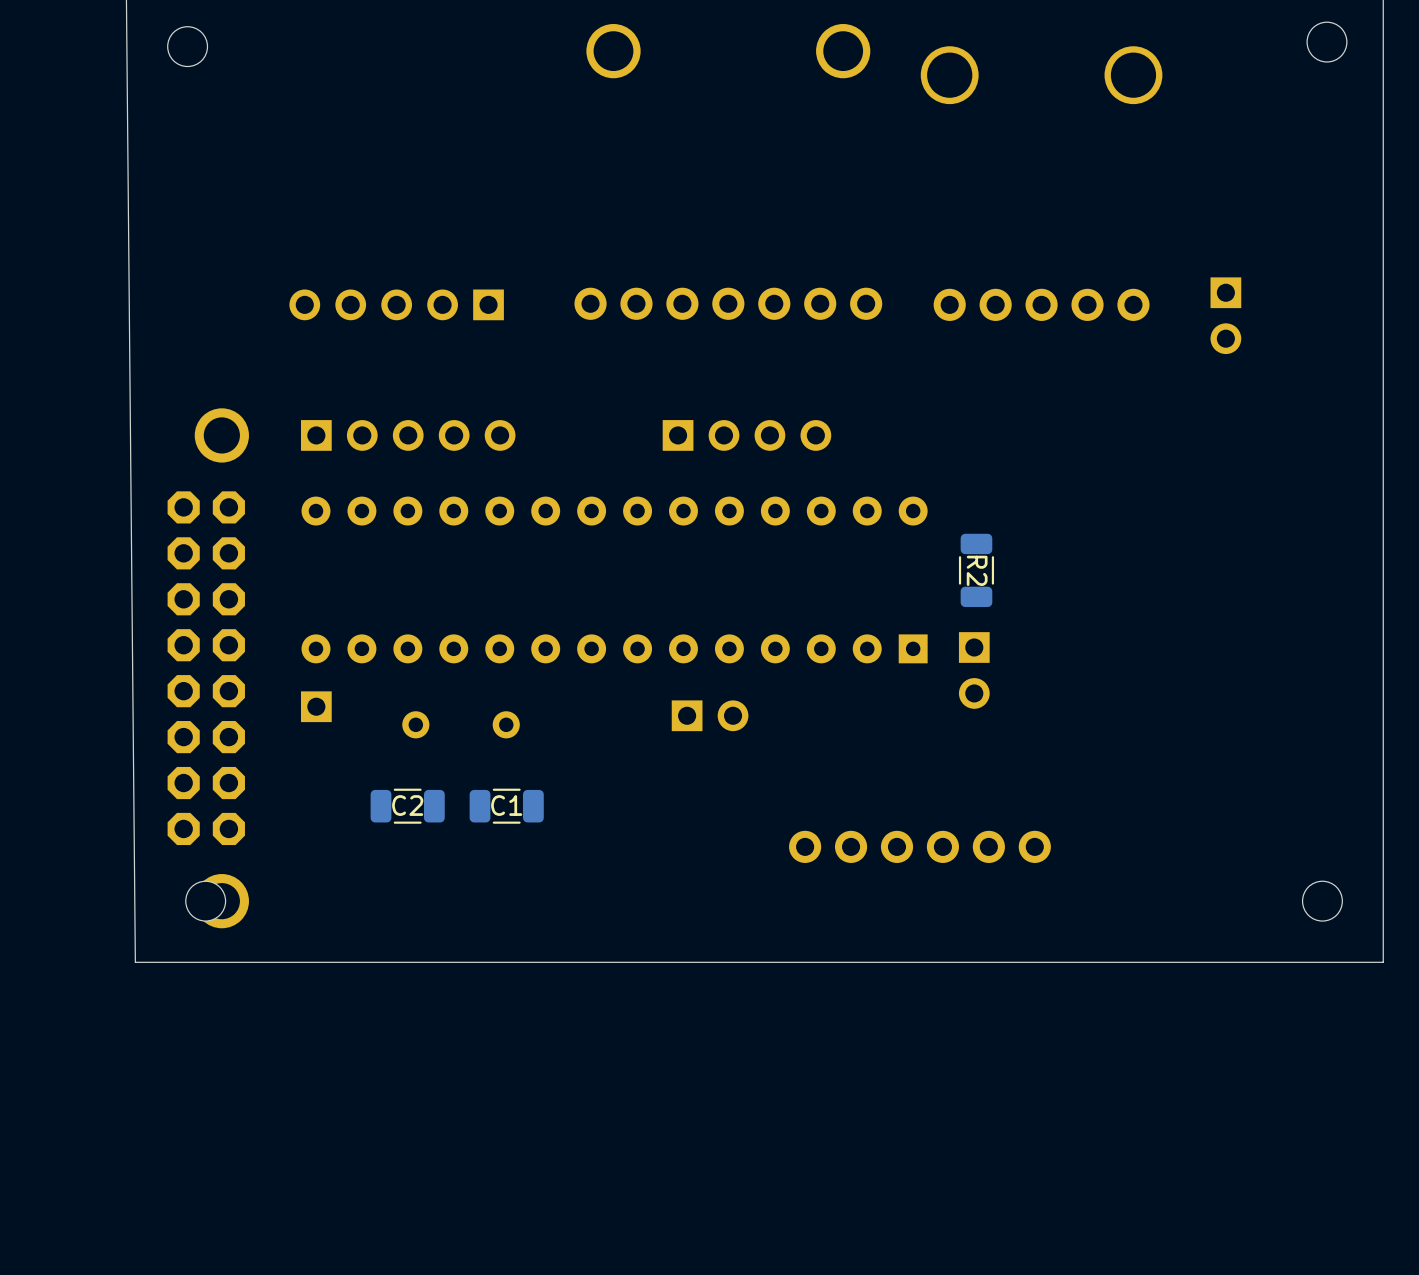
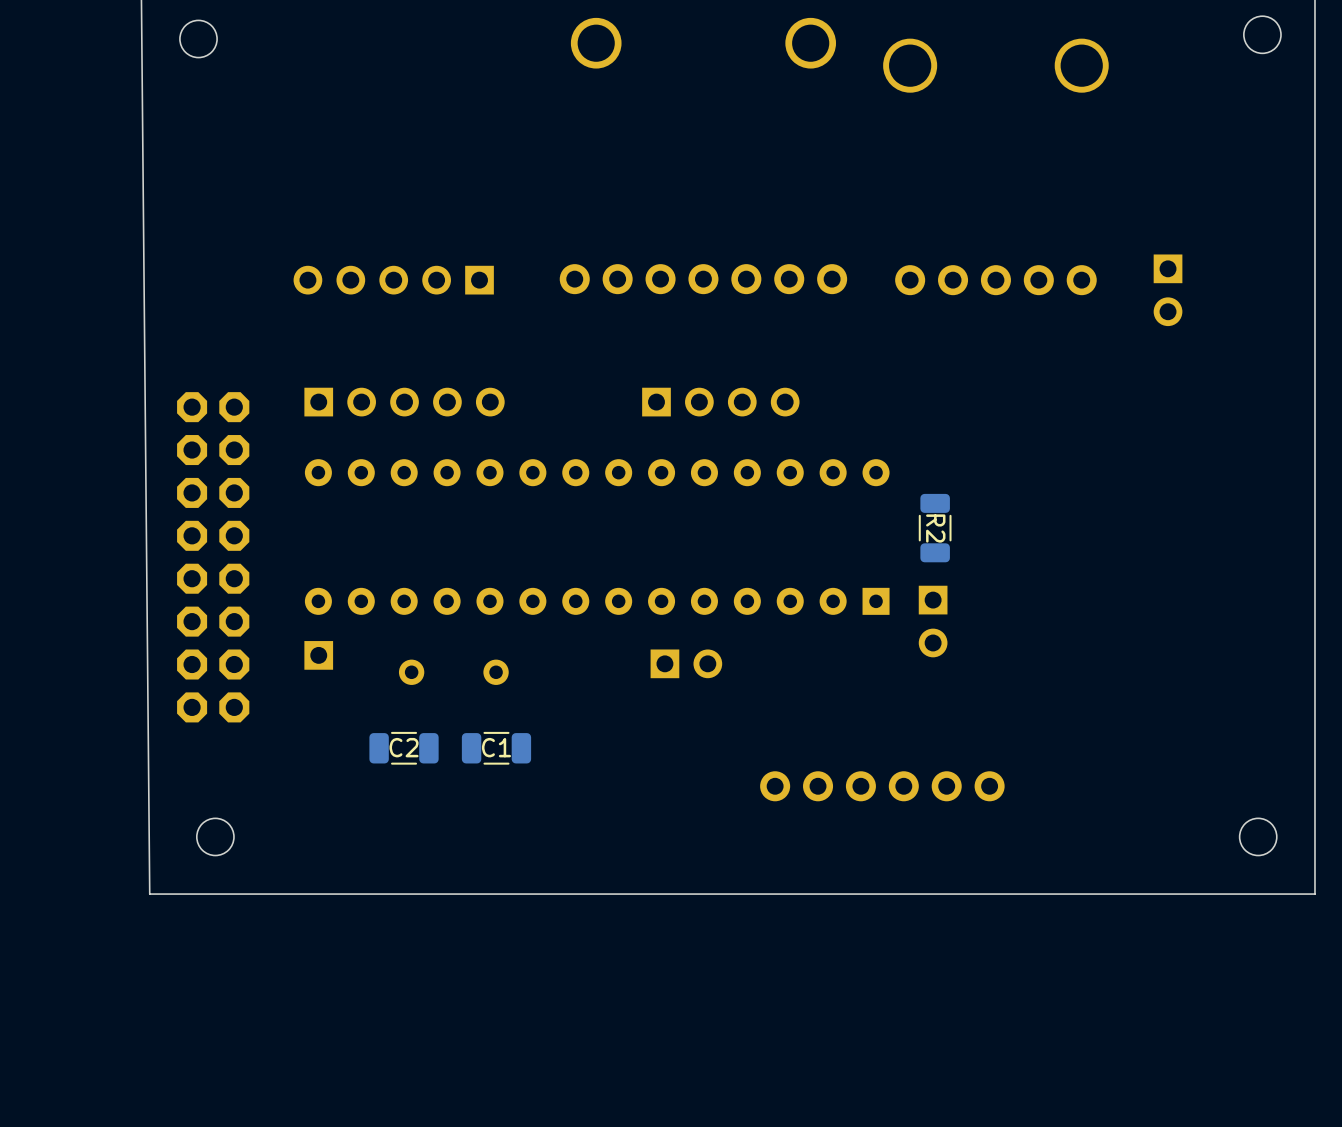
part: none -> (213, 557)
part: (208, 668) -> none

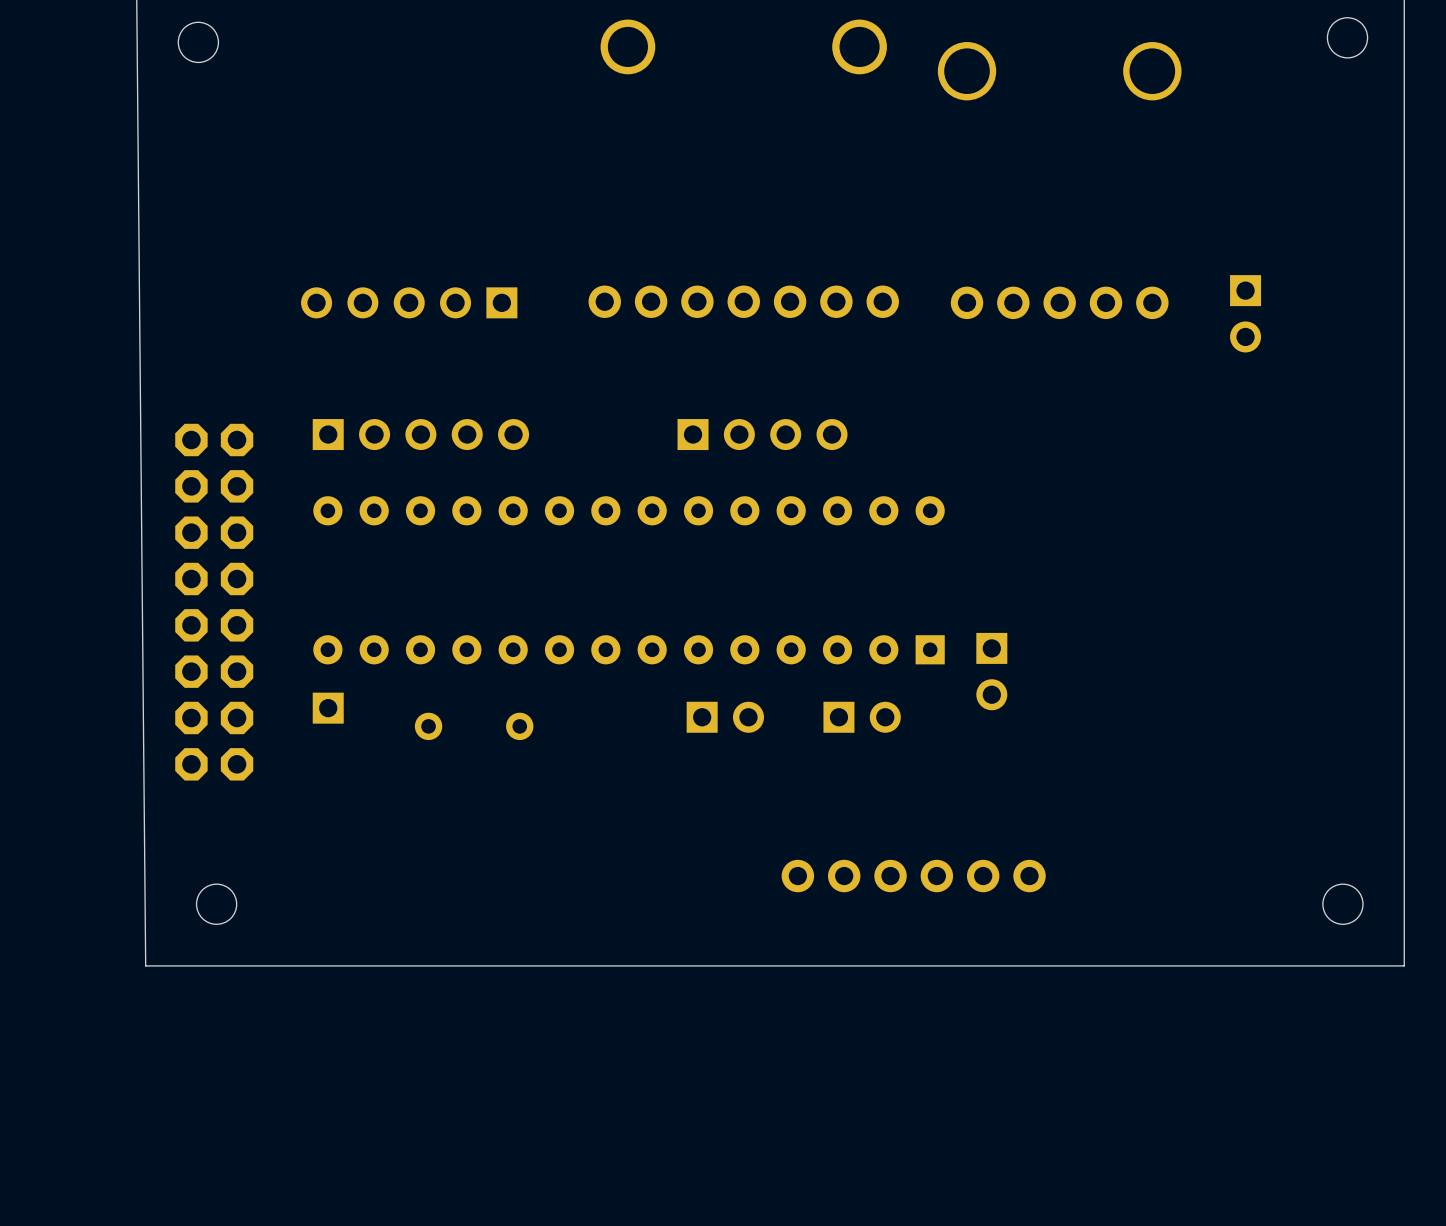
R2: (935, 528) -> none
part: none -> (862, 717)
C2: (404, 748) -> none
C1: (496, 748) -> none
part position: (882, 786) -> (913, 876)

